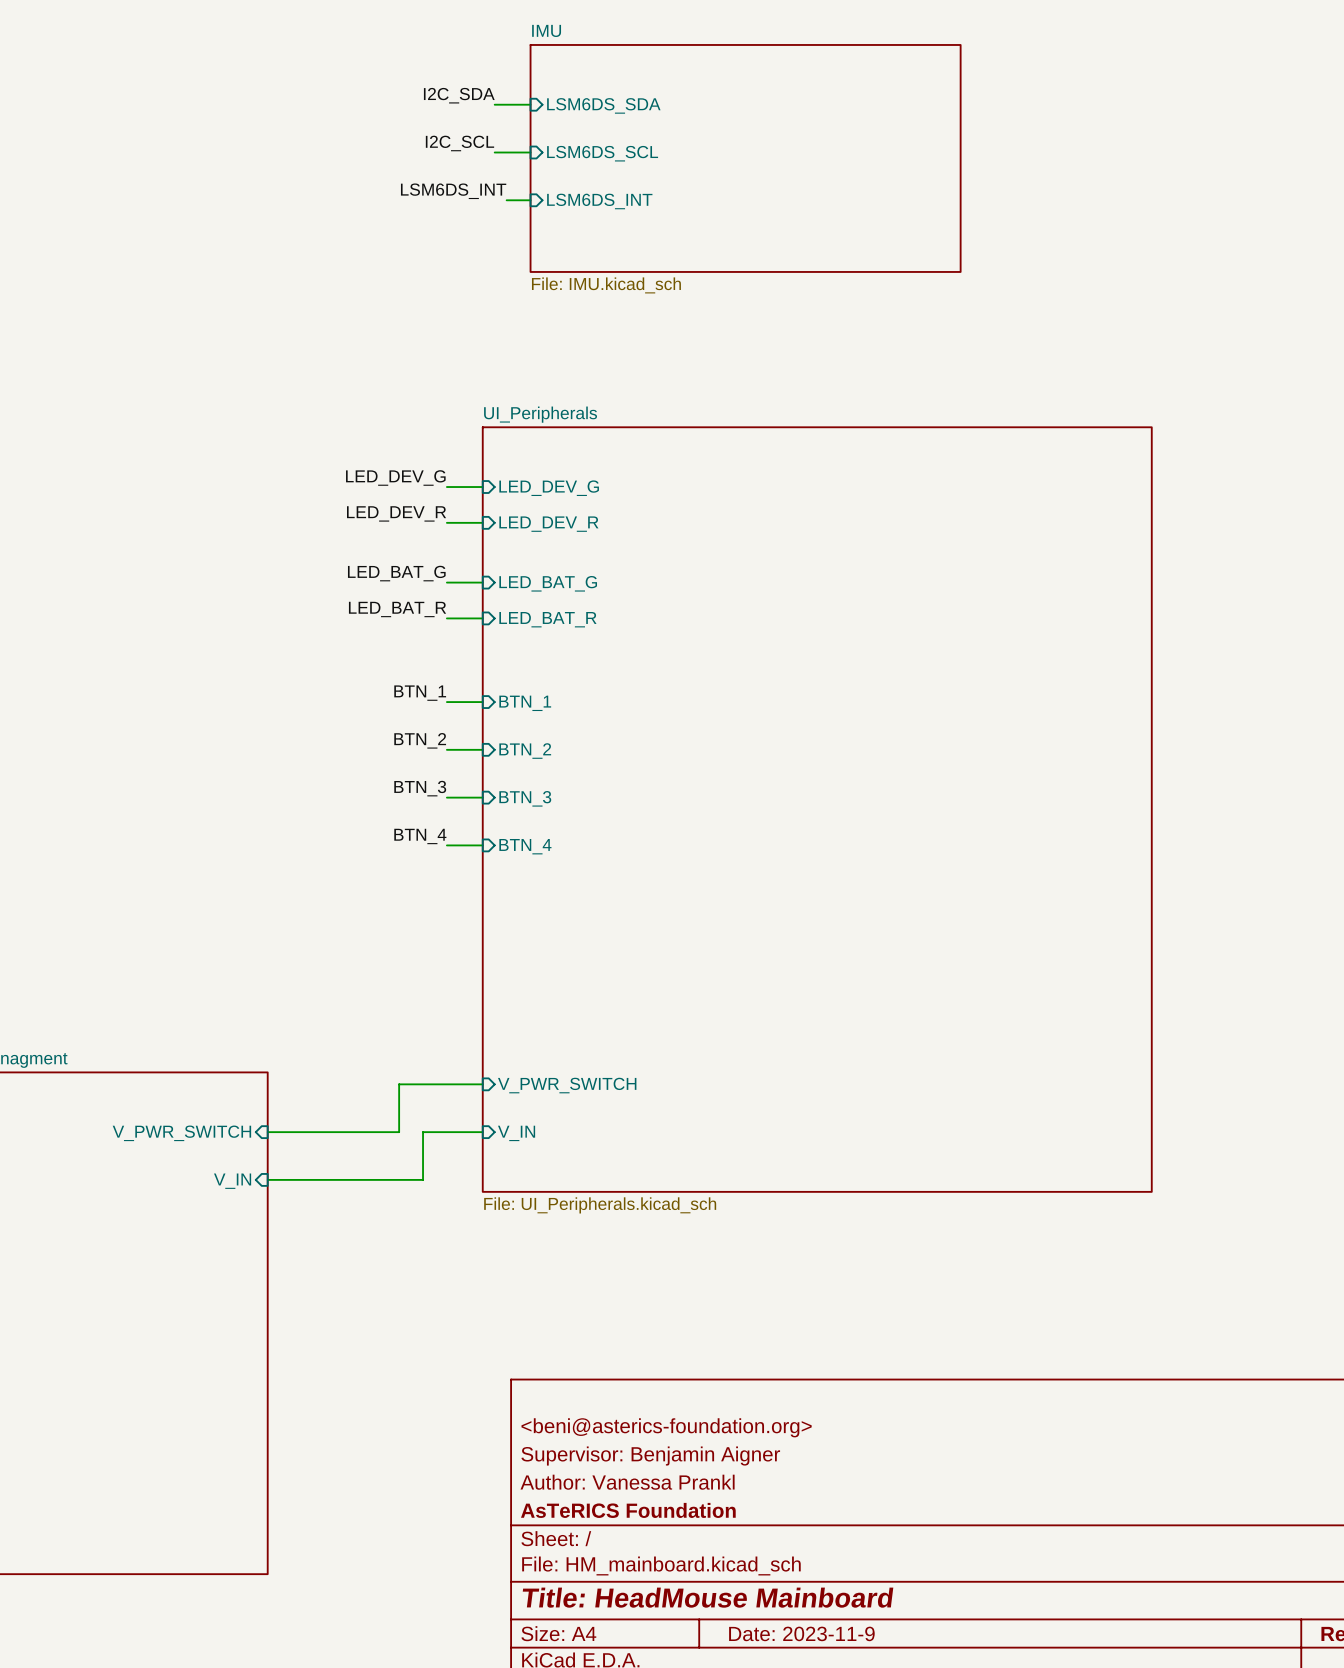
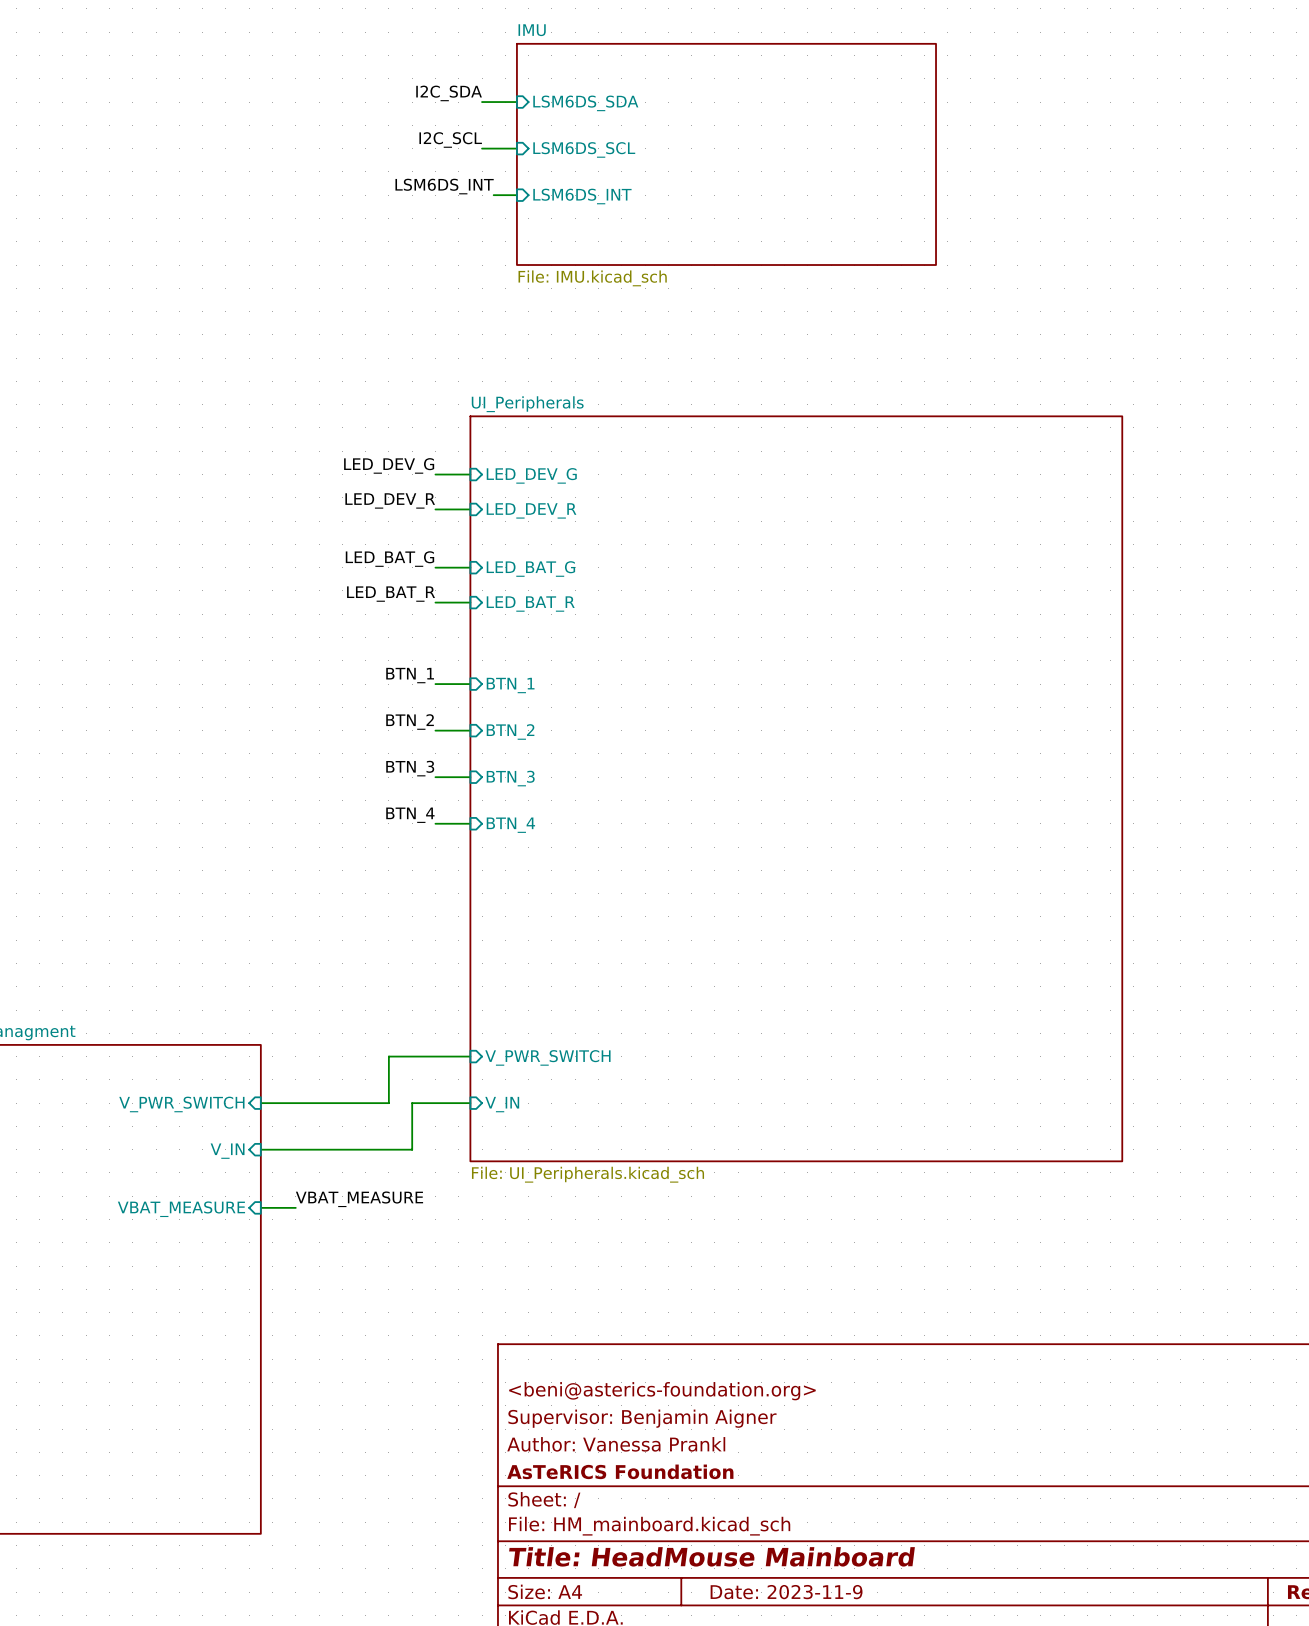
label: none -> VBAT_MEASURE (359, 1199)
wire: none -> (260, 1207) (295, 1207)
sheet pin: none -> VBAT_MEASURE (181, 1209)

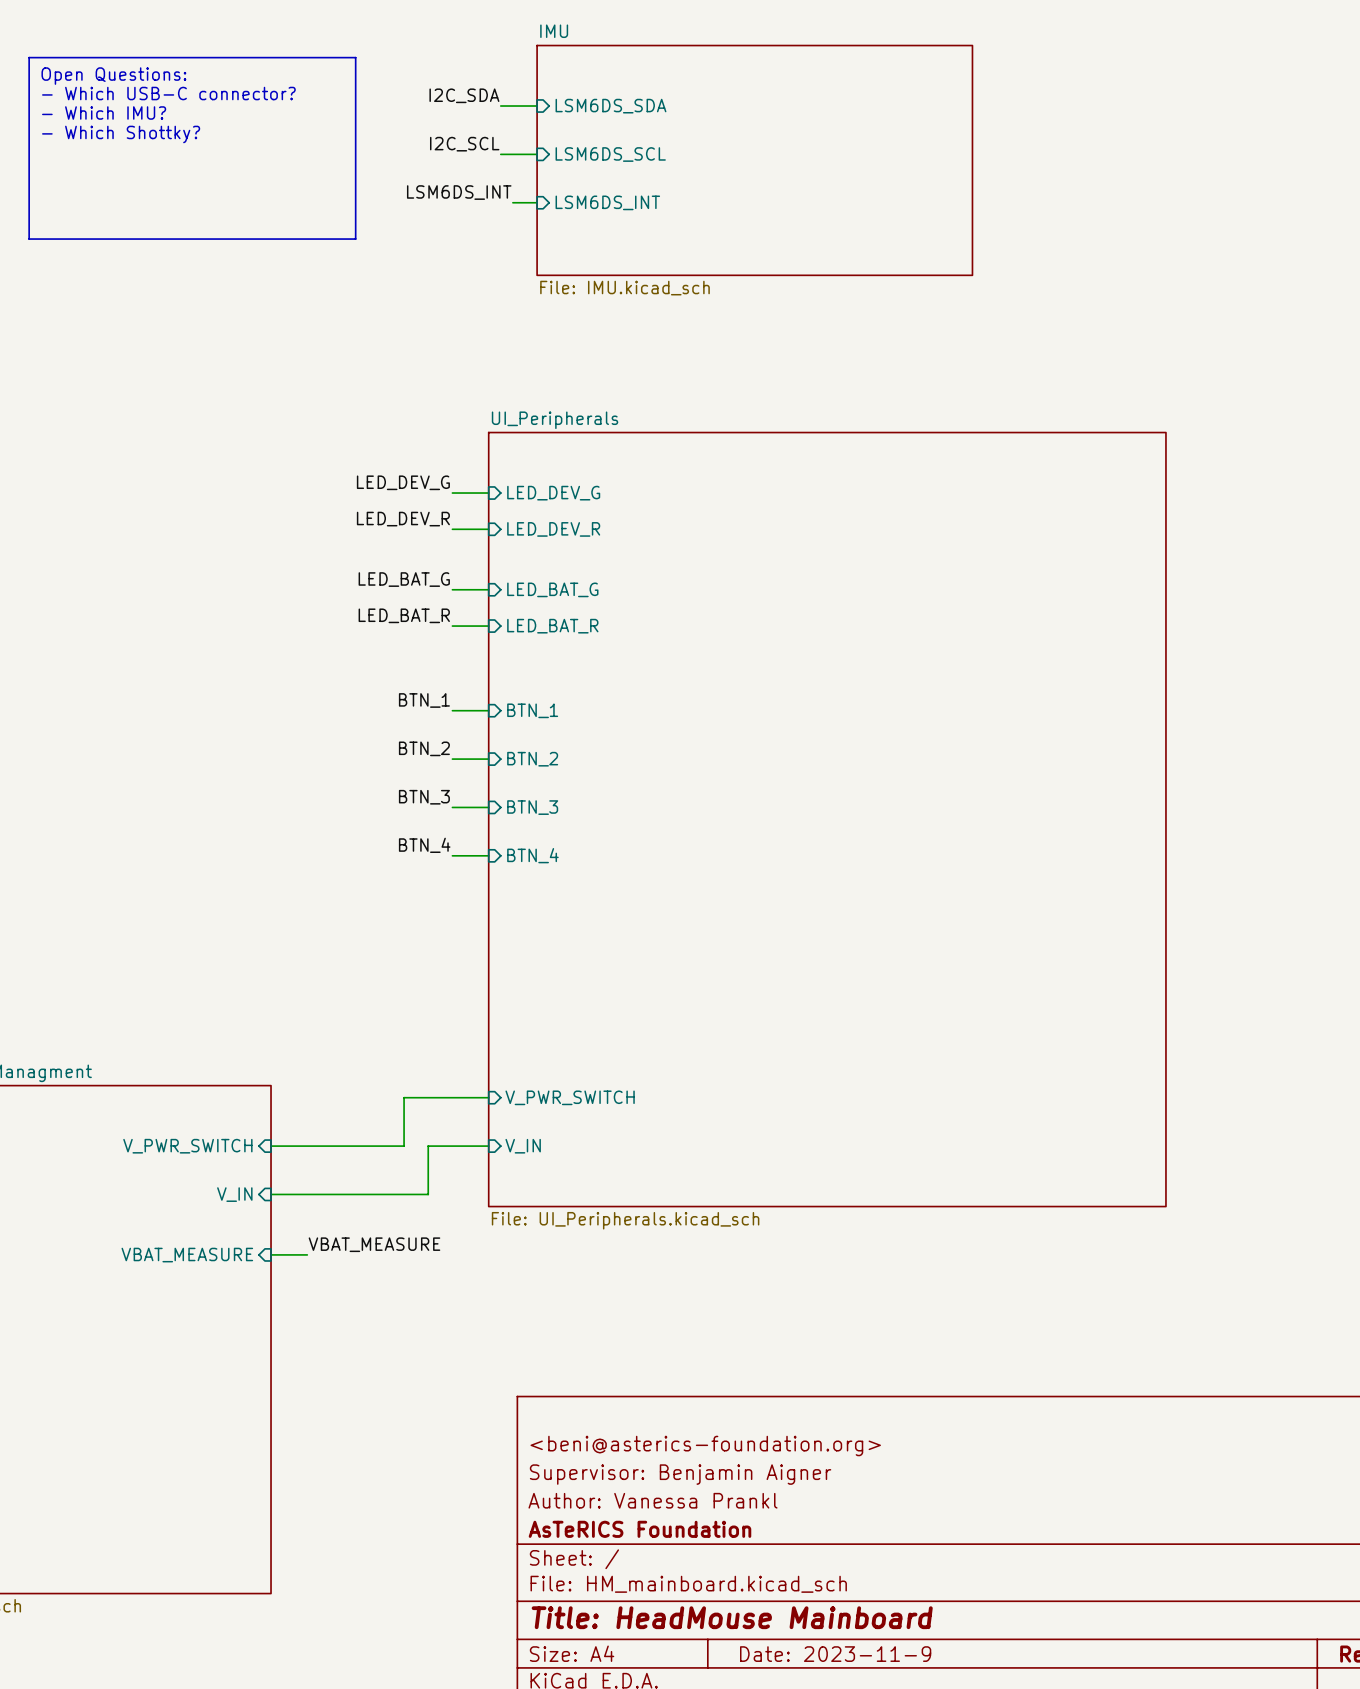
line: none -> (29, 57) (355, 57) (355, 239) (29, 239) (29, 57)
text: none -> Open Questions: (113, 76)
text: none -> - Which USB-C connector? (168, 93)
text: none -> - Which IMU? (104, 112)
text: none -> - Which Shottky? (121, 134)

